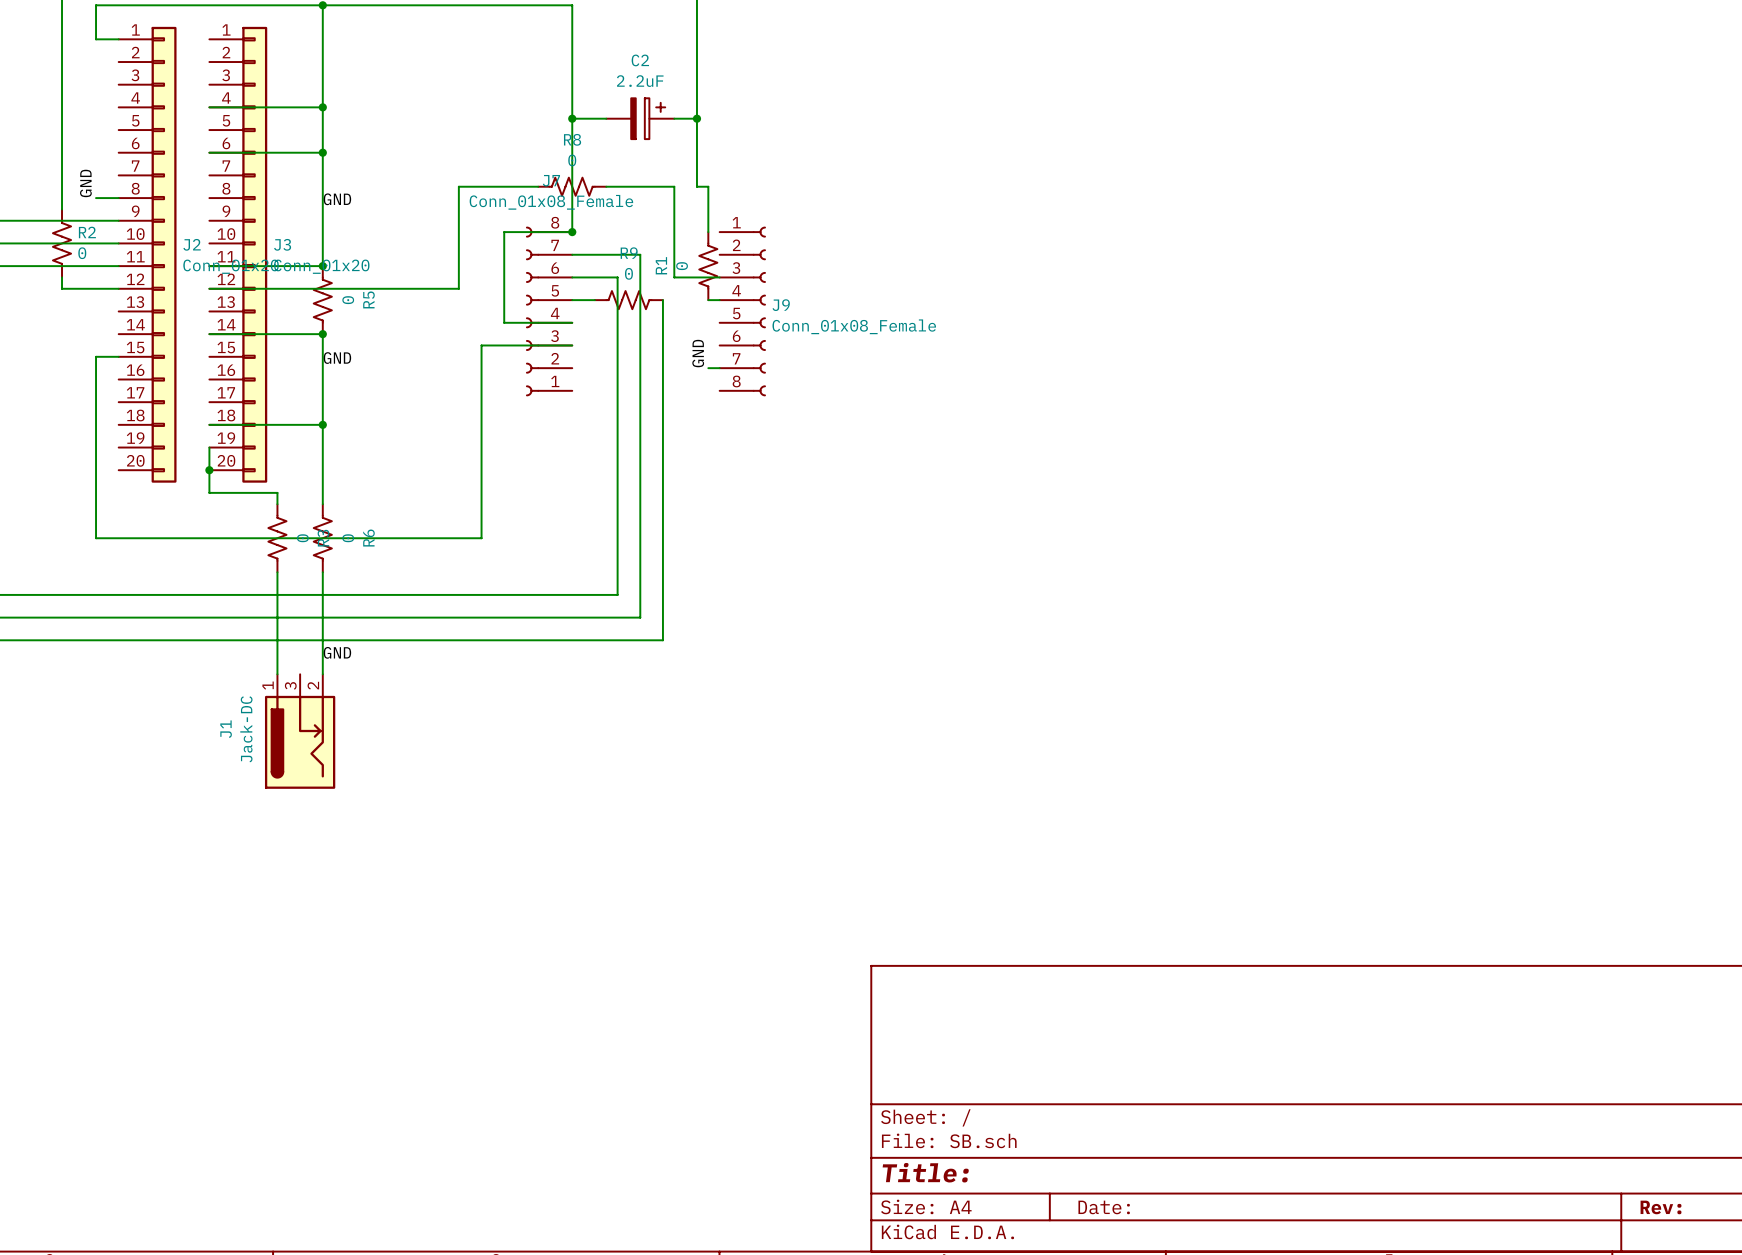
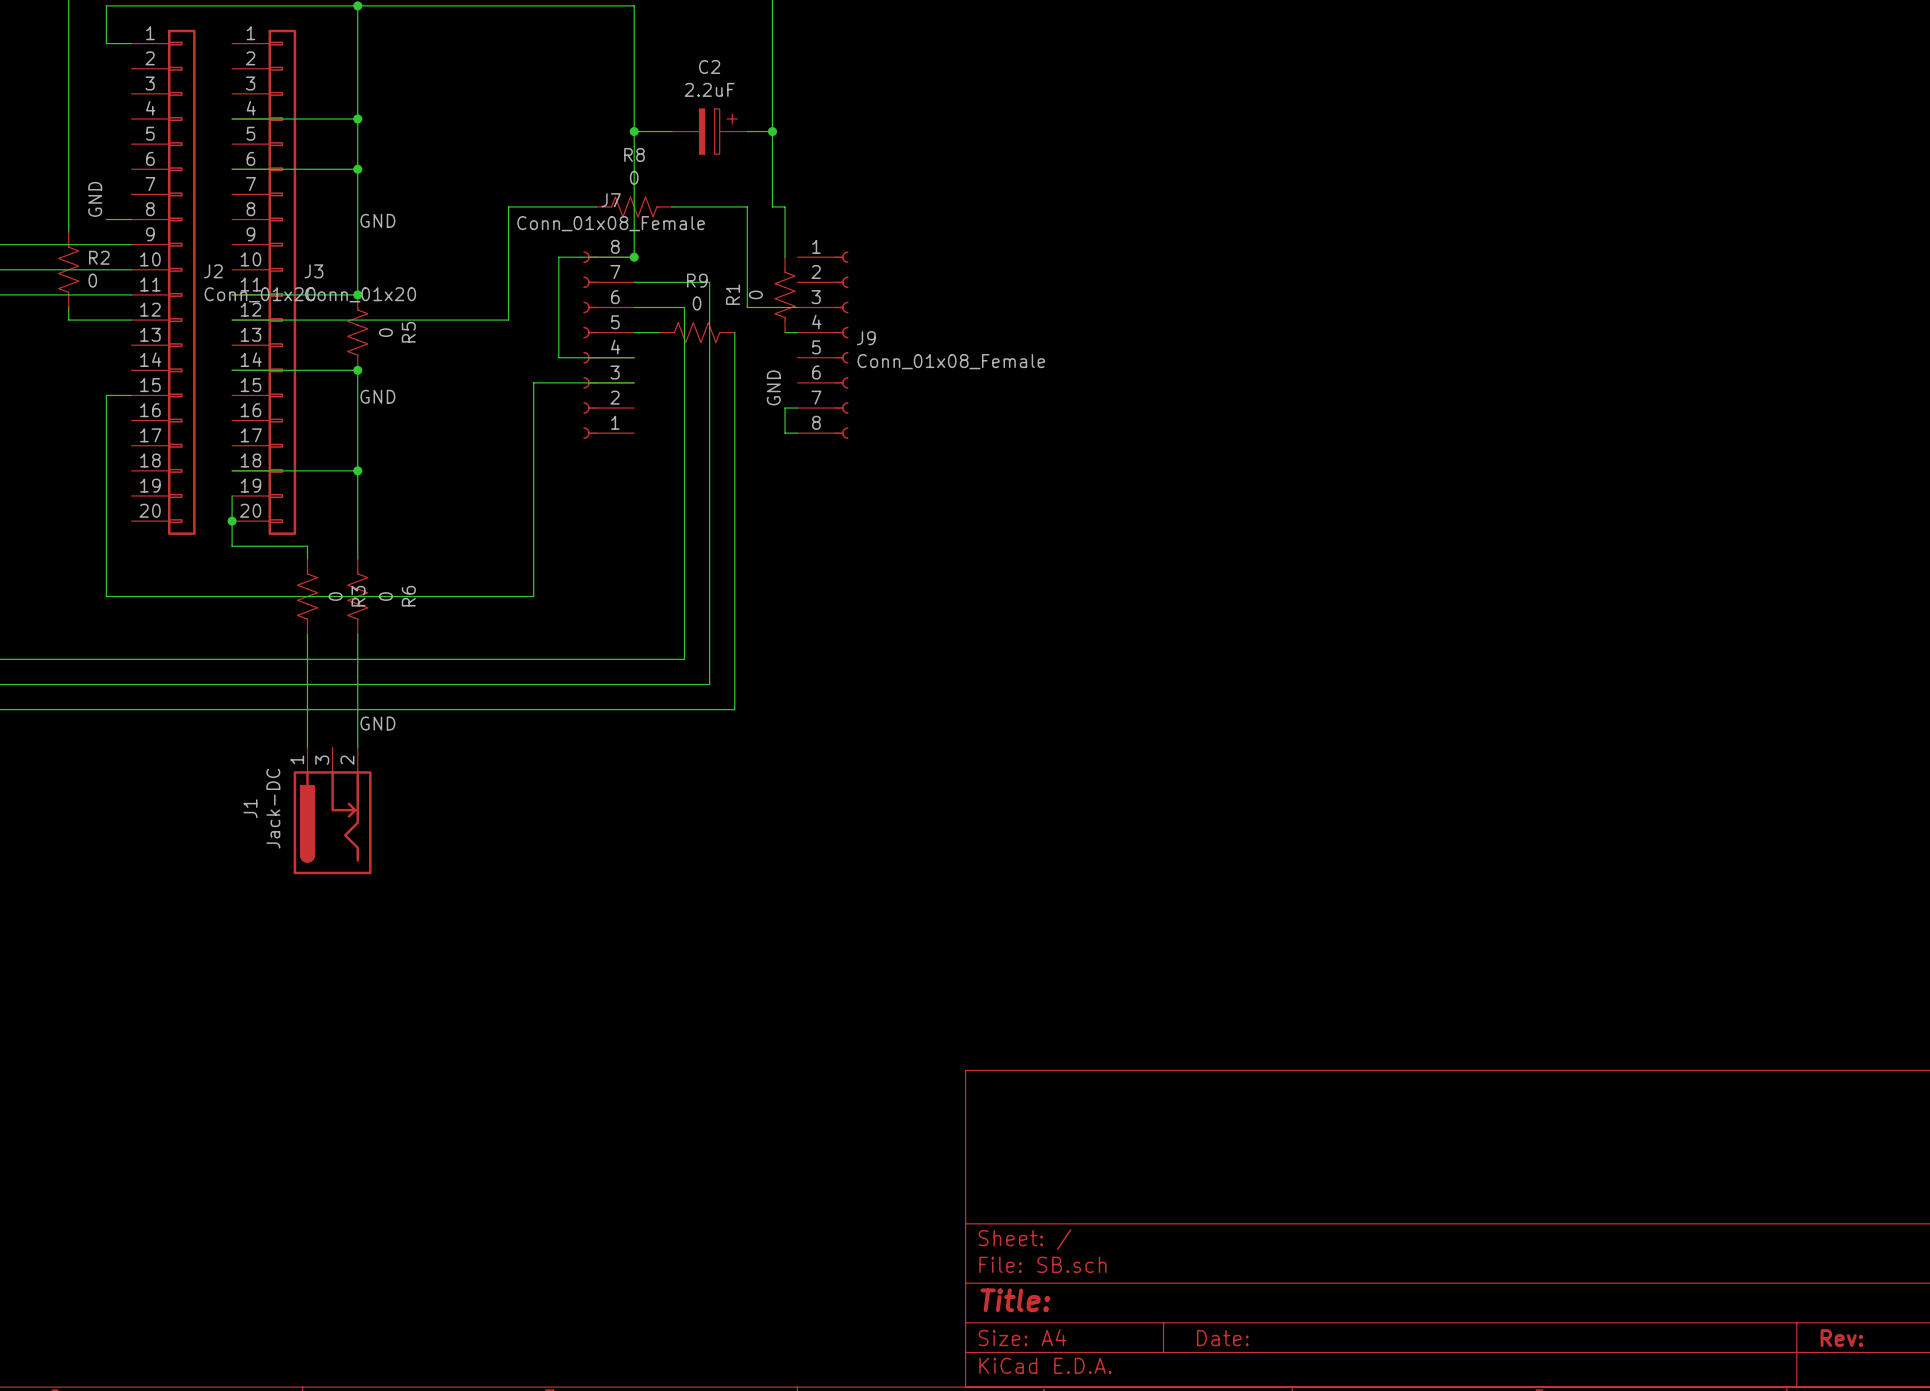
wire: none -> (785, 408) (785, 433) (797, 433)

